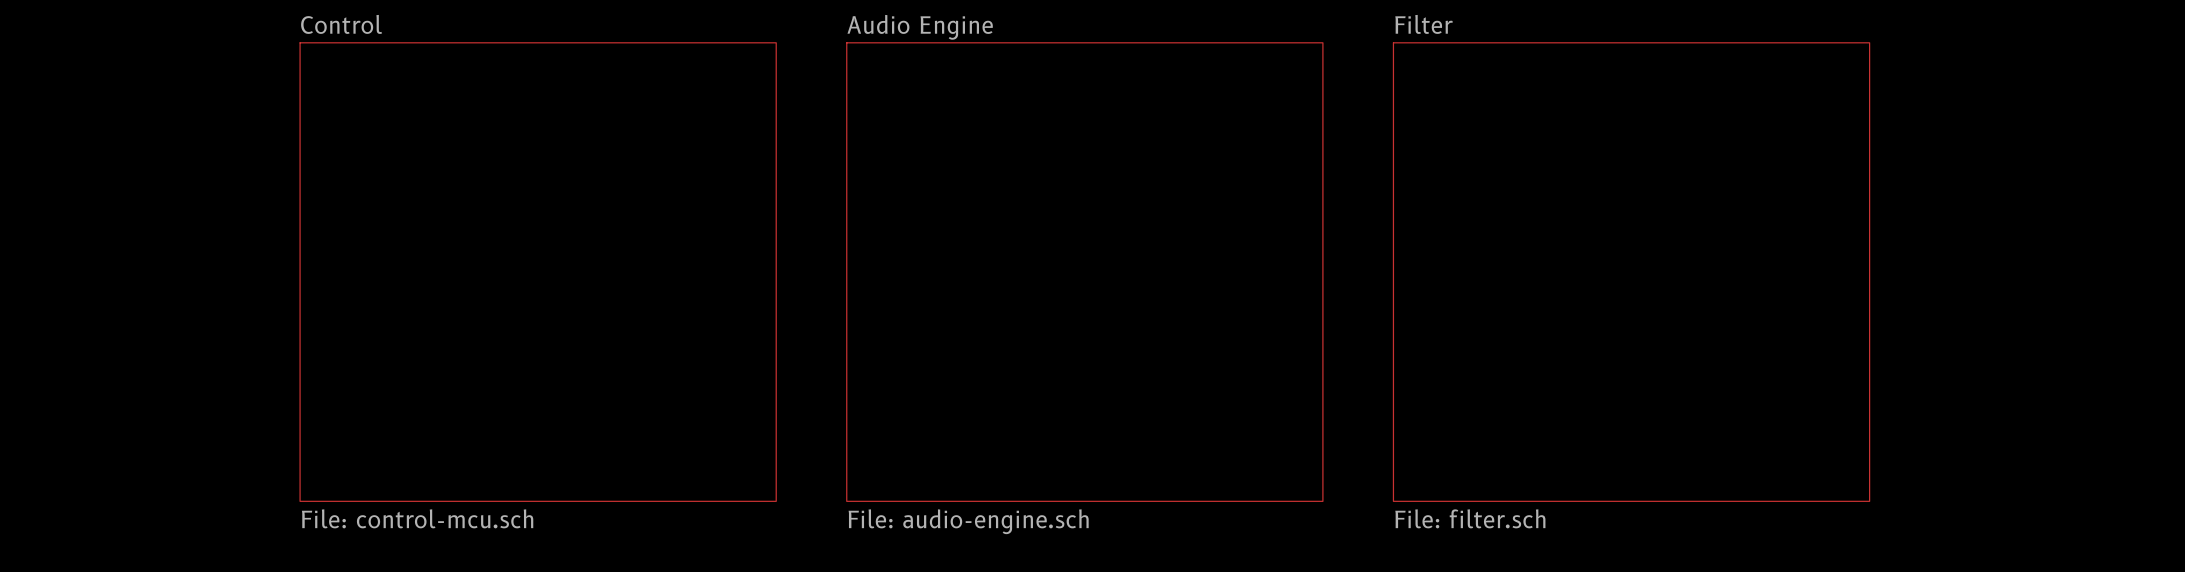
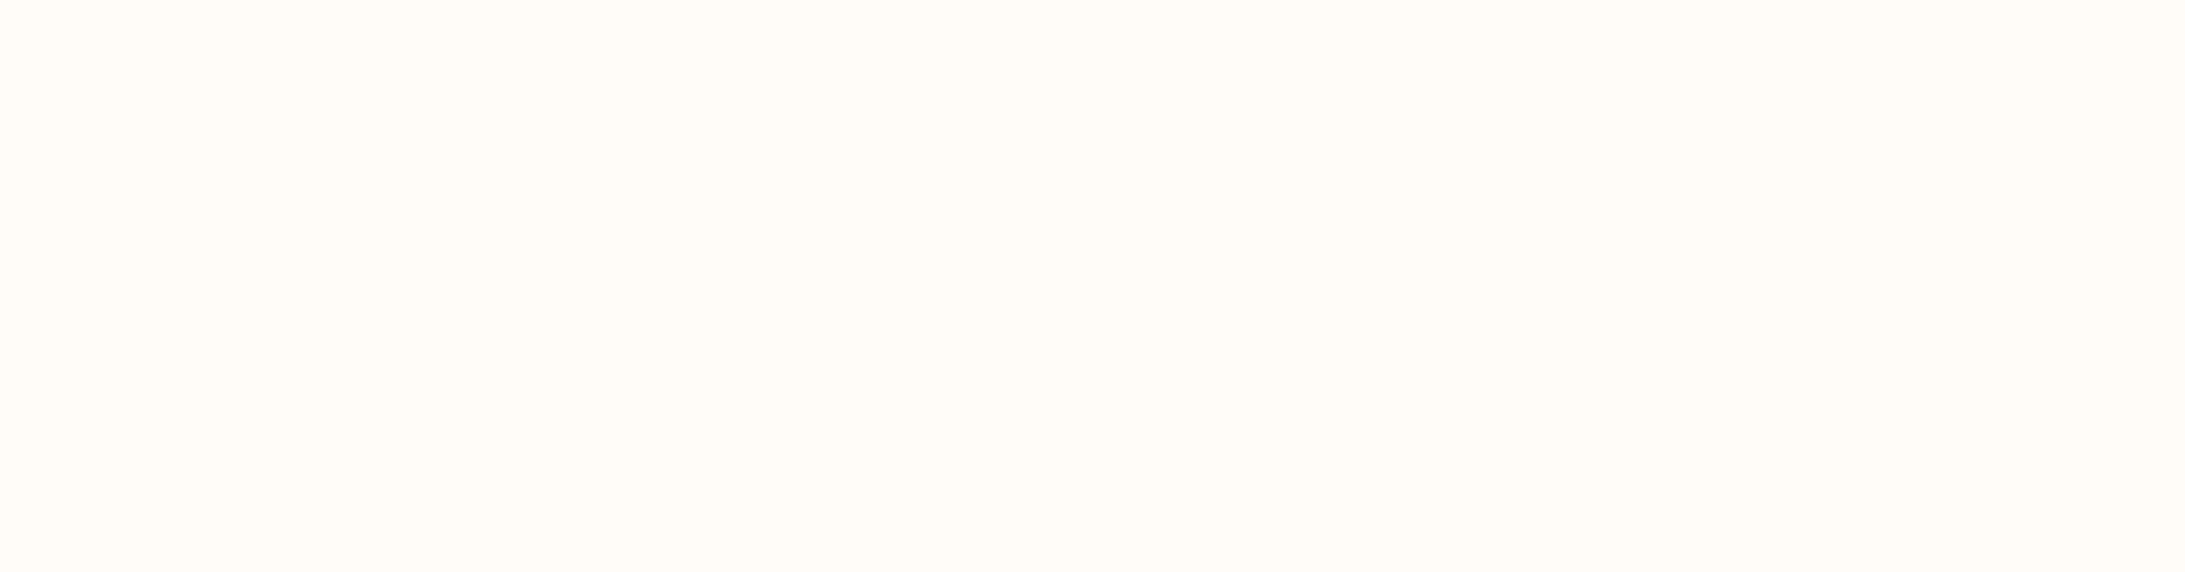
sheet Control: File: control-mcu.sch (538, 272) -> none
sheet Audio Engine: File: audio-engine.sch (1084, 272) -> none
sheet Filter: File: filter.sch (1631, 272) -> none

